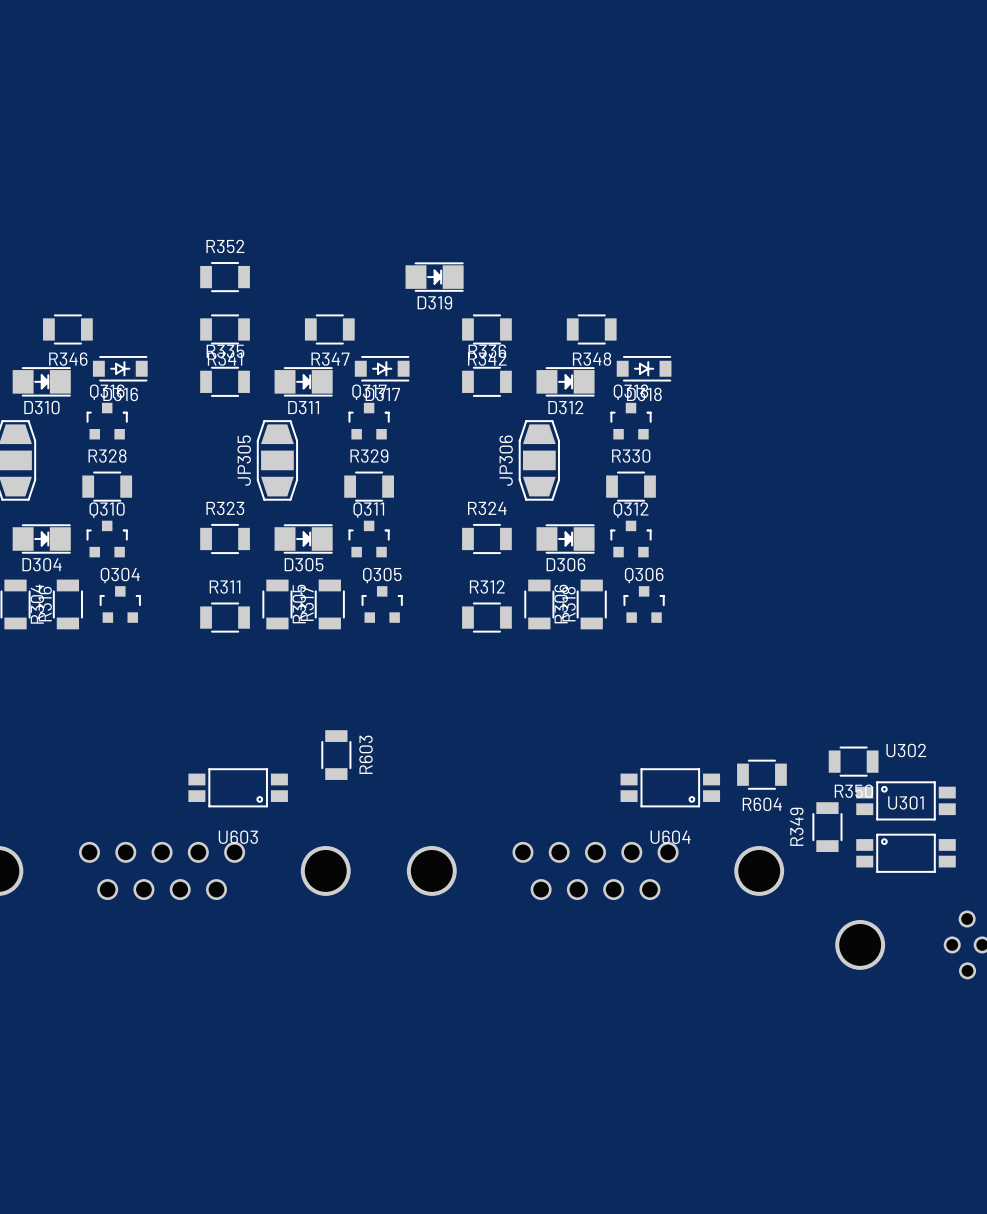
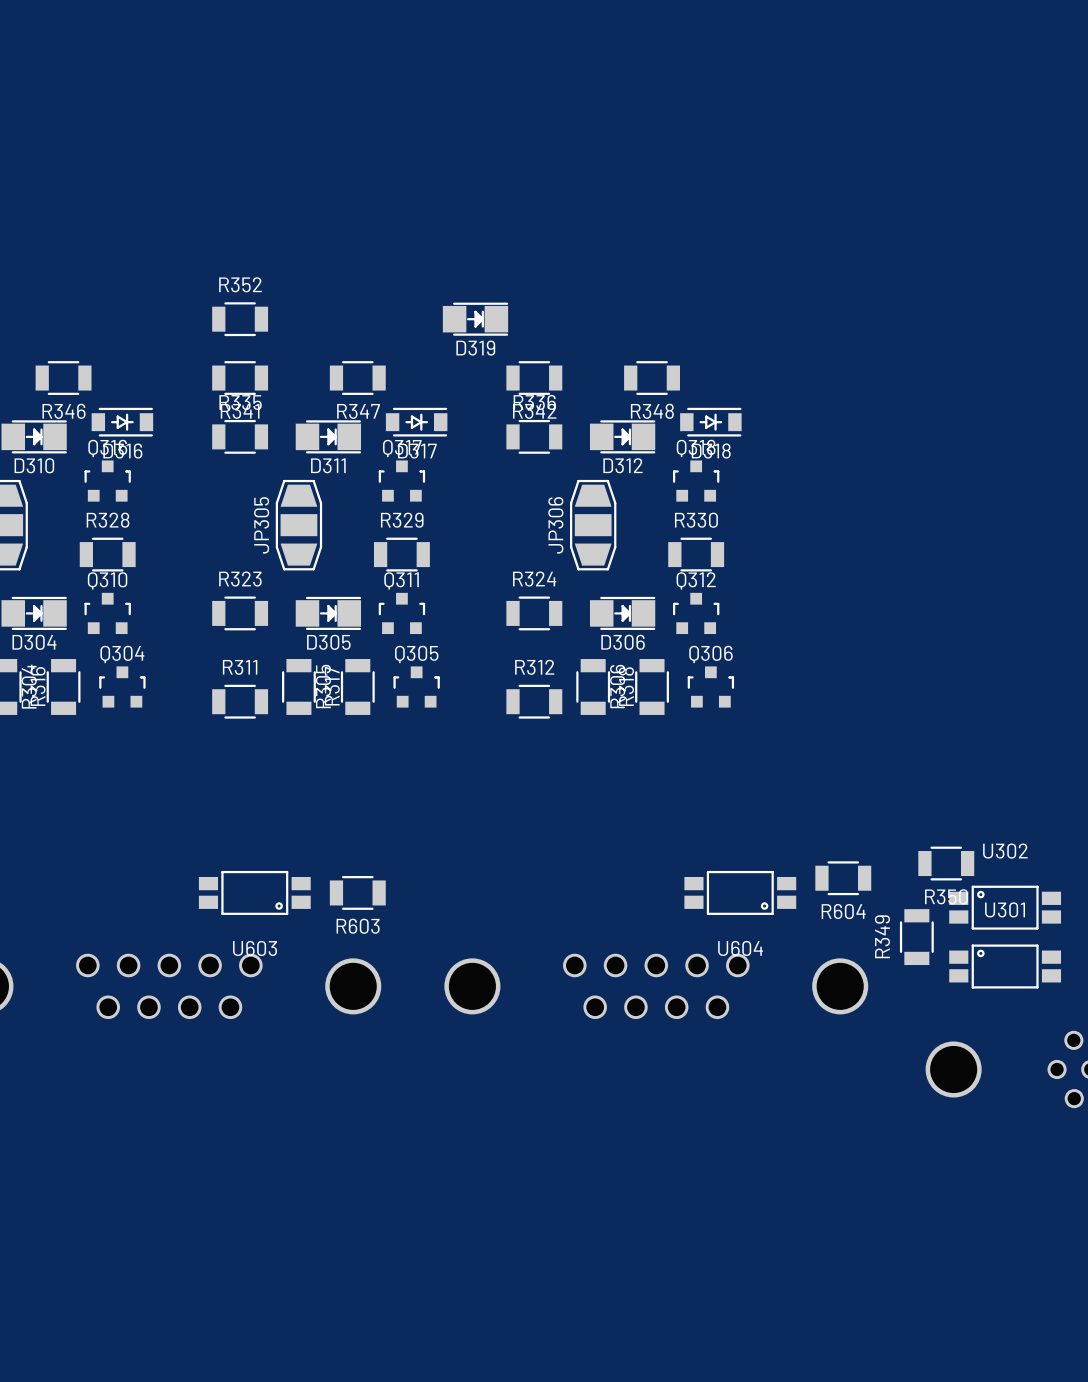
R603 rotation: 0° (336, 755) -> 90° clockwise (357, 892)
R603 position: (336, 755) -> (357, 892)

